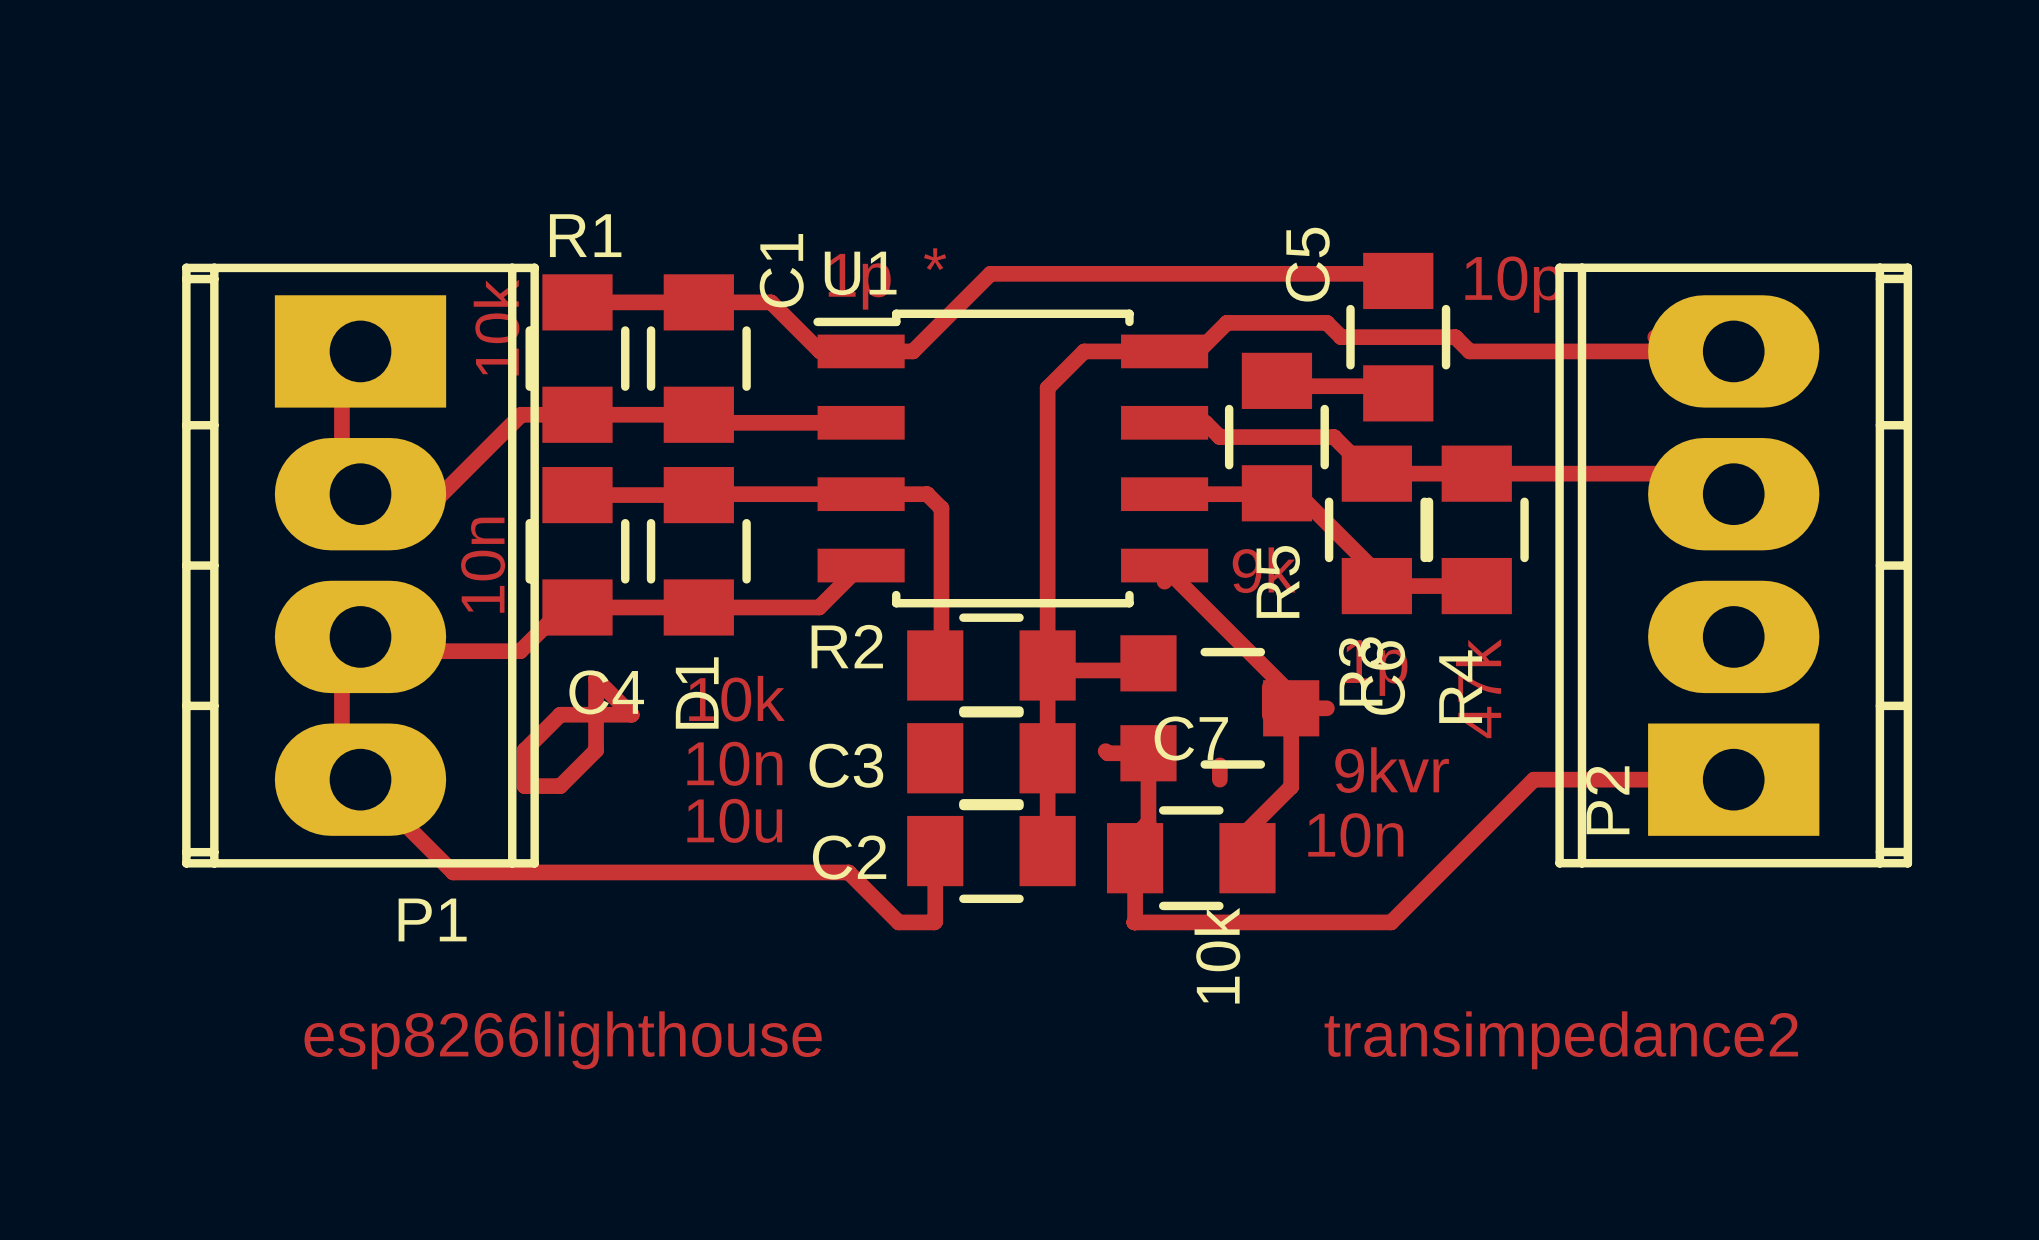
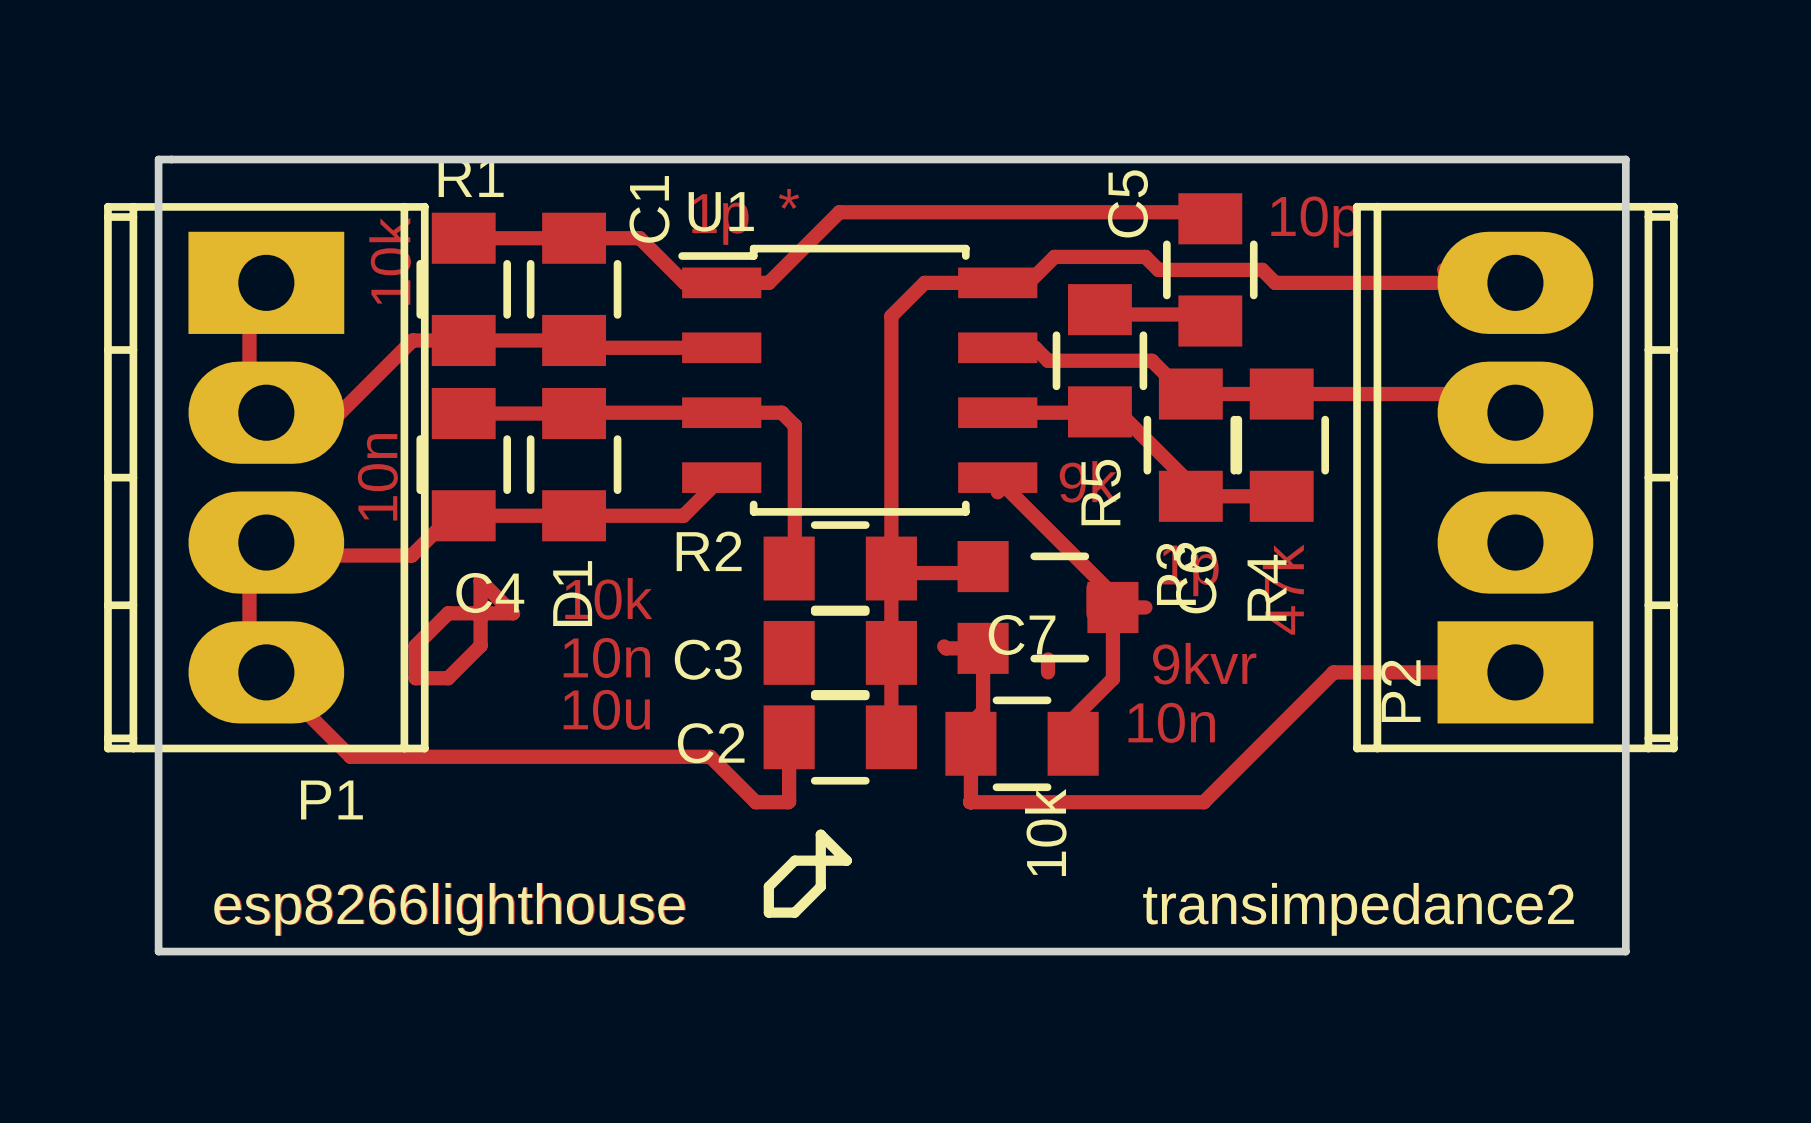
board edge: none -> (158, 159) (1625, 159) (1625, 951) (158, 951) (158, 159)
line: none -> (820, 834) (820, 886) (794, 912) (768, 912) (768, 886) (794, 860) (846, 860) (820, 834)
text: none -> esp8266lighthouse (449, 909)
text: none -> transimpedance2 (1358, 909)

